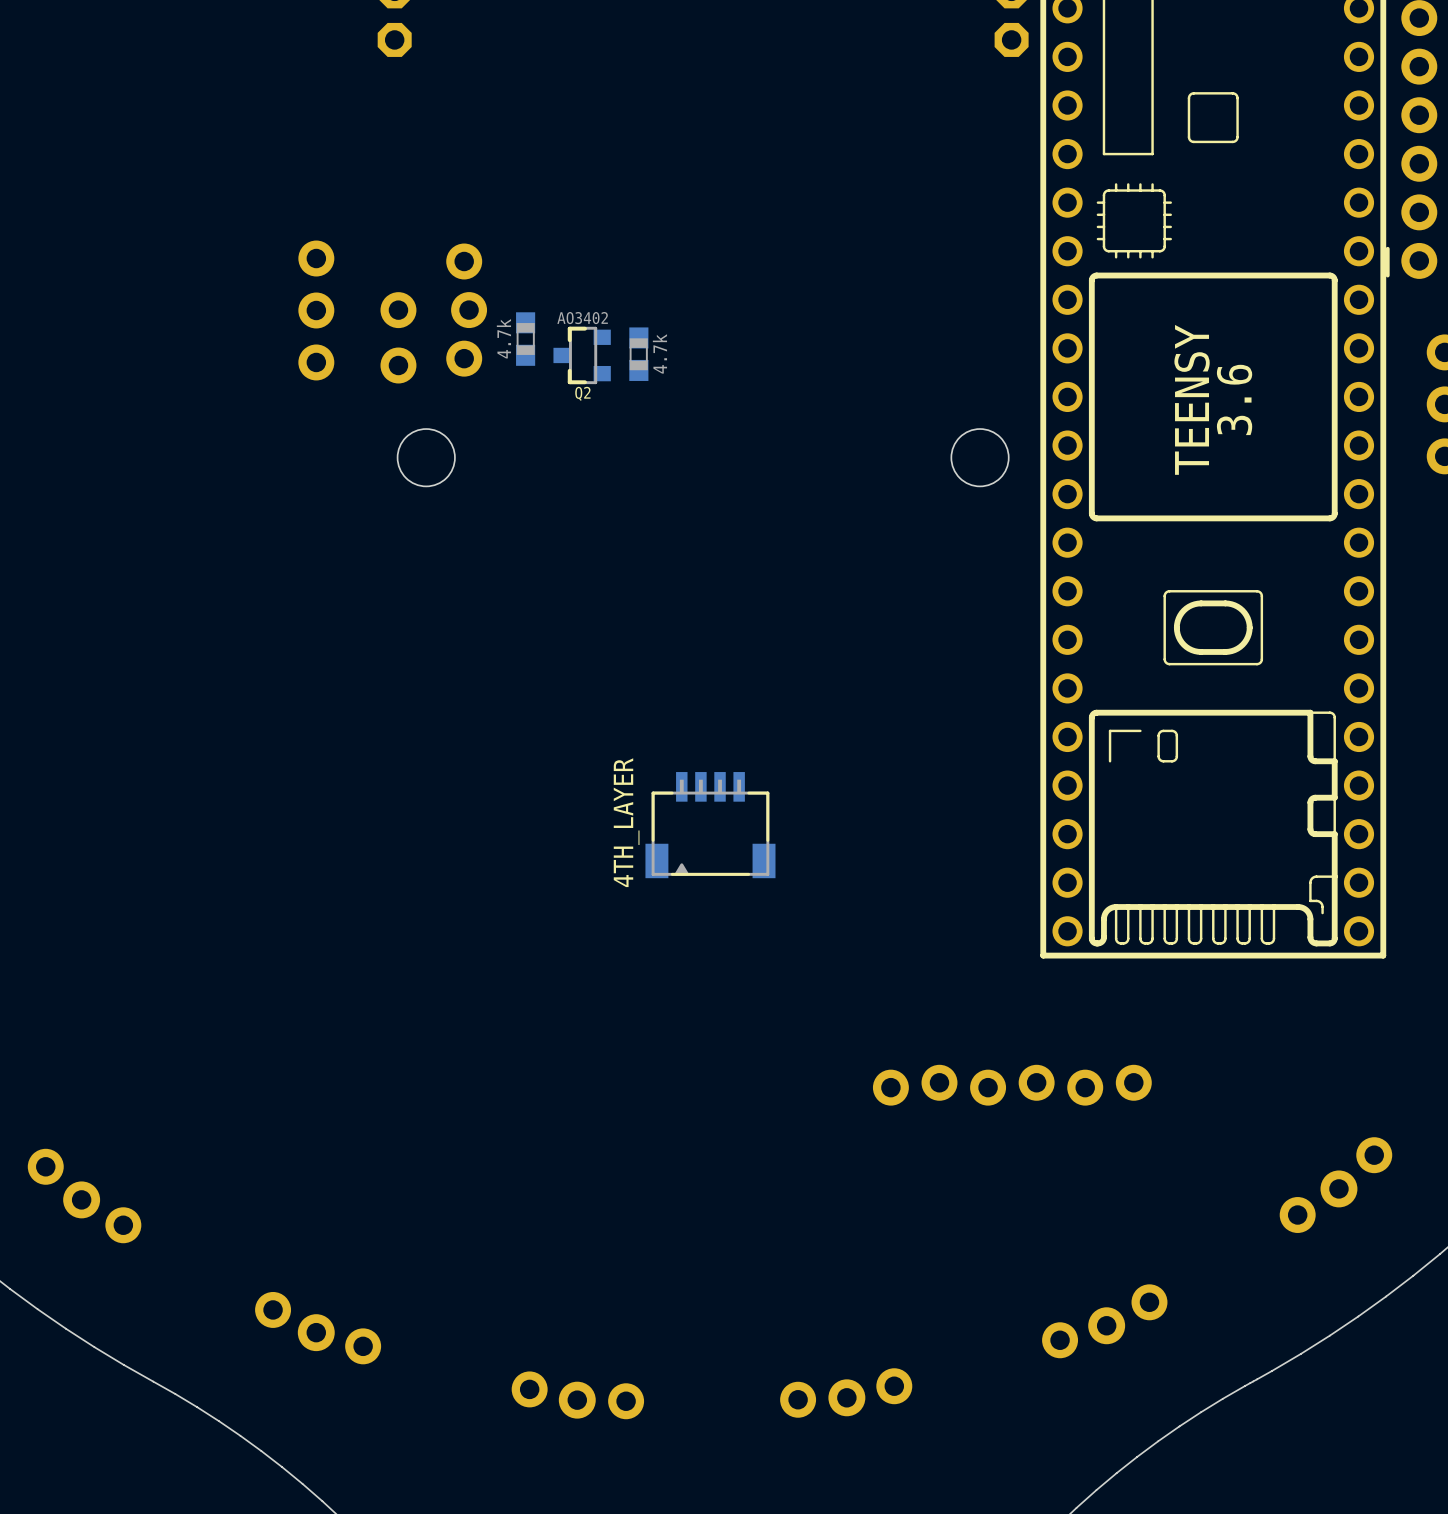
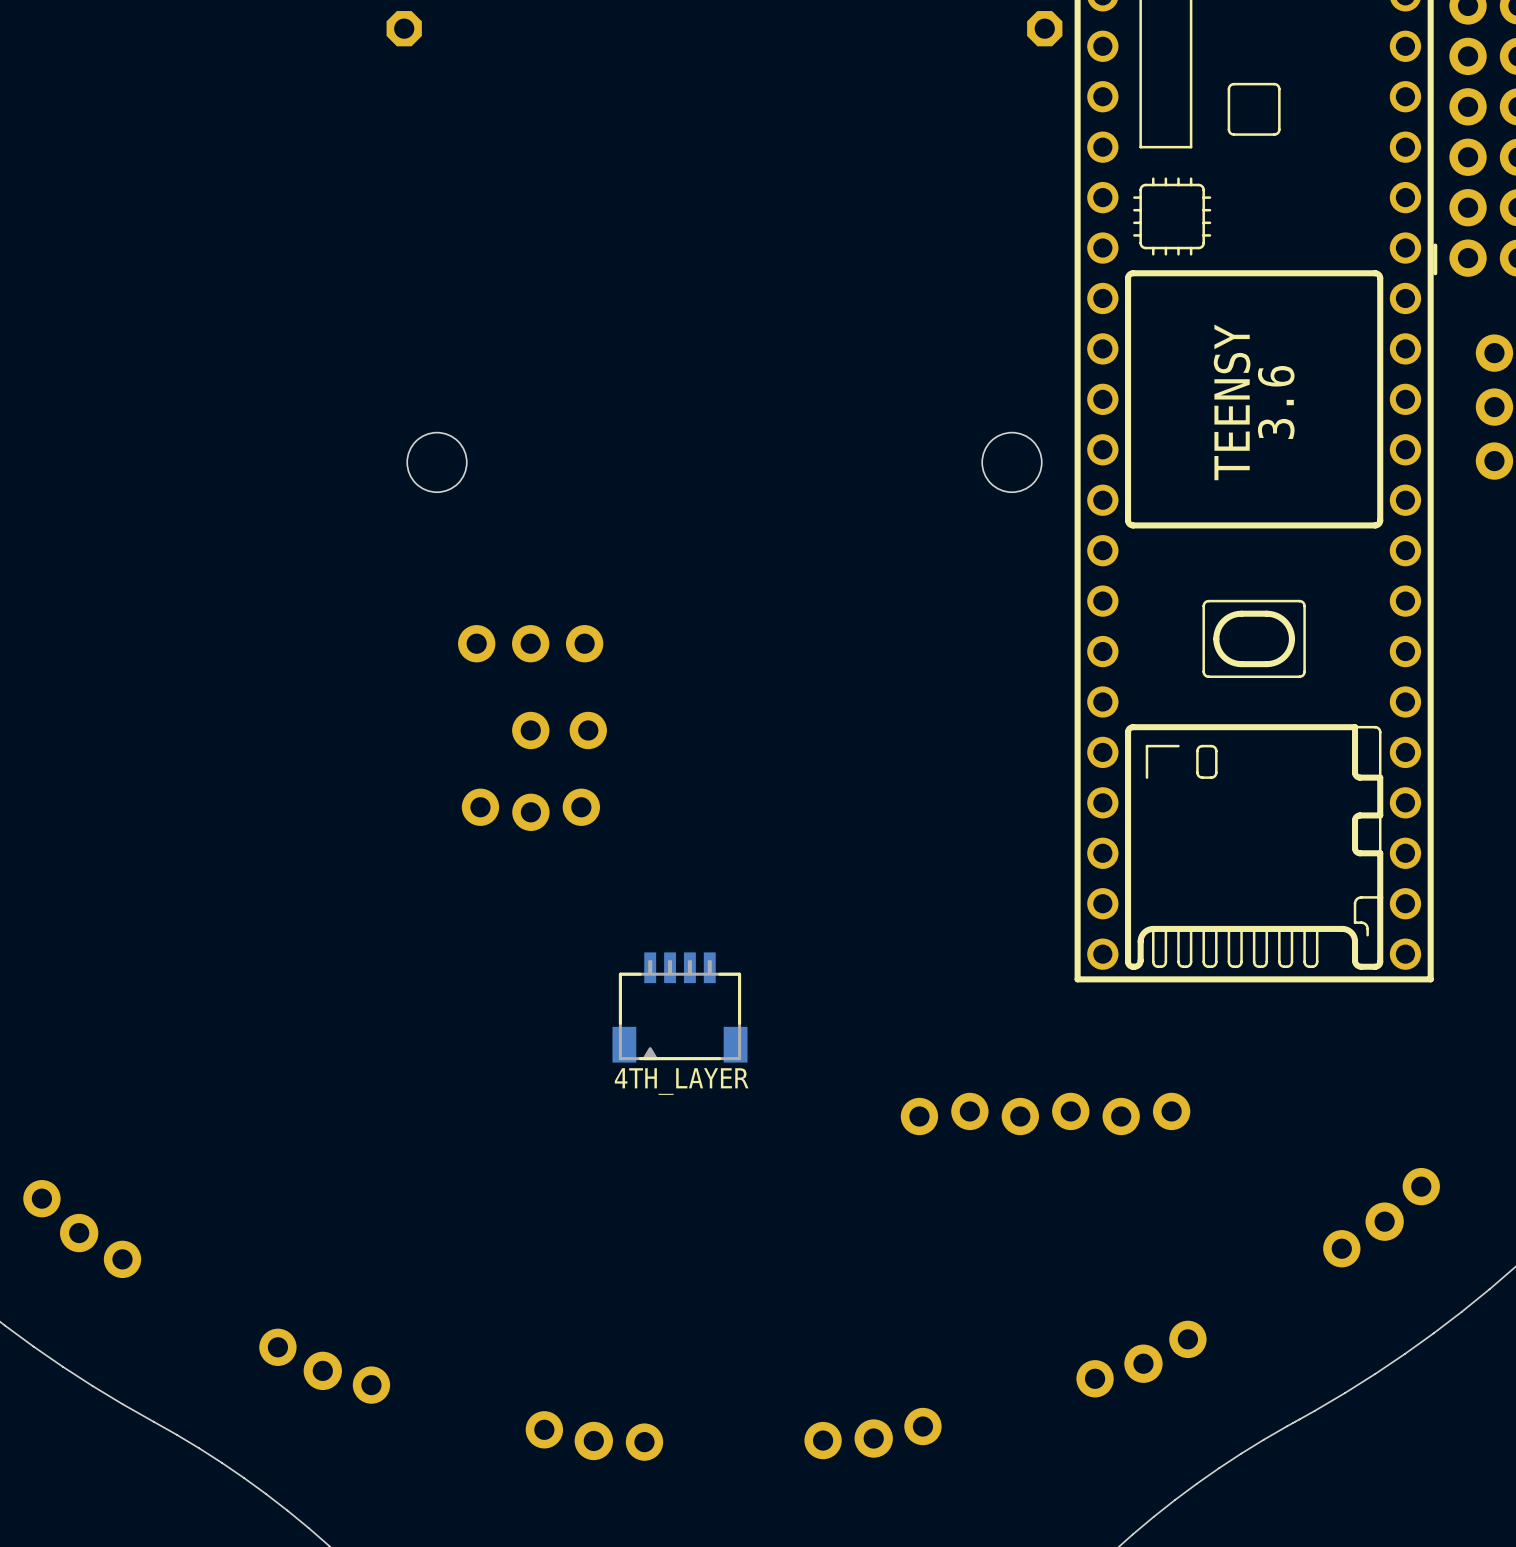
part rotation: 0° (316, 310) -> 90° clockwise (530, 643)
part position: (316, 310) -> (530, 643)
part: (466, 310) -> none
part rotation: 0° (398, 337) -> 90° clockwise (559, 730)
part position: (398, 337) -> (559, 730)
part: 4.7k (525, 339) -> none
part: 4.7k (638, 354) -> none
Q2: AO3402 (582, 355) -> none
part: none -> (530, 809)
4TH_LAYER name rotation: 0° (626, 822) -> 90° clockwise (681, 1081)
4TH_LAYER position: (710, 825) -> (679, 1007)

